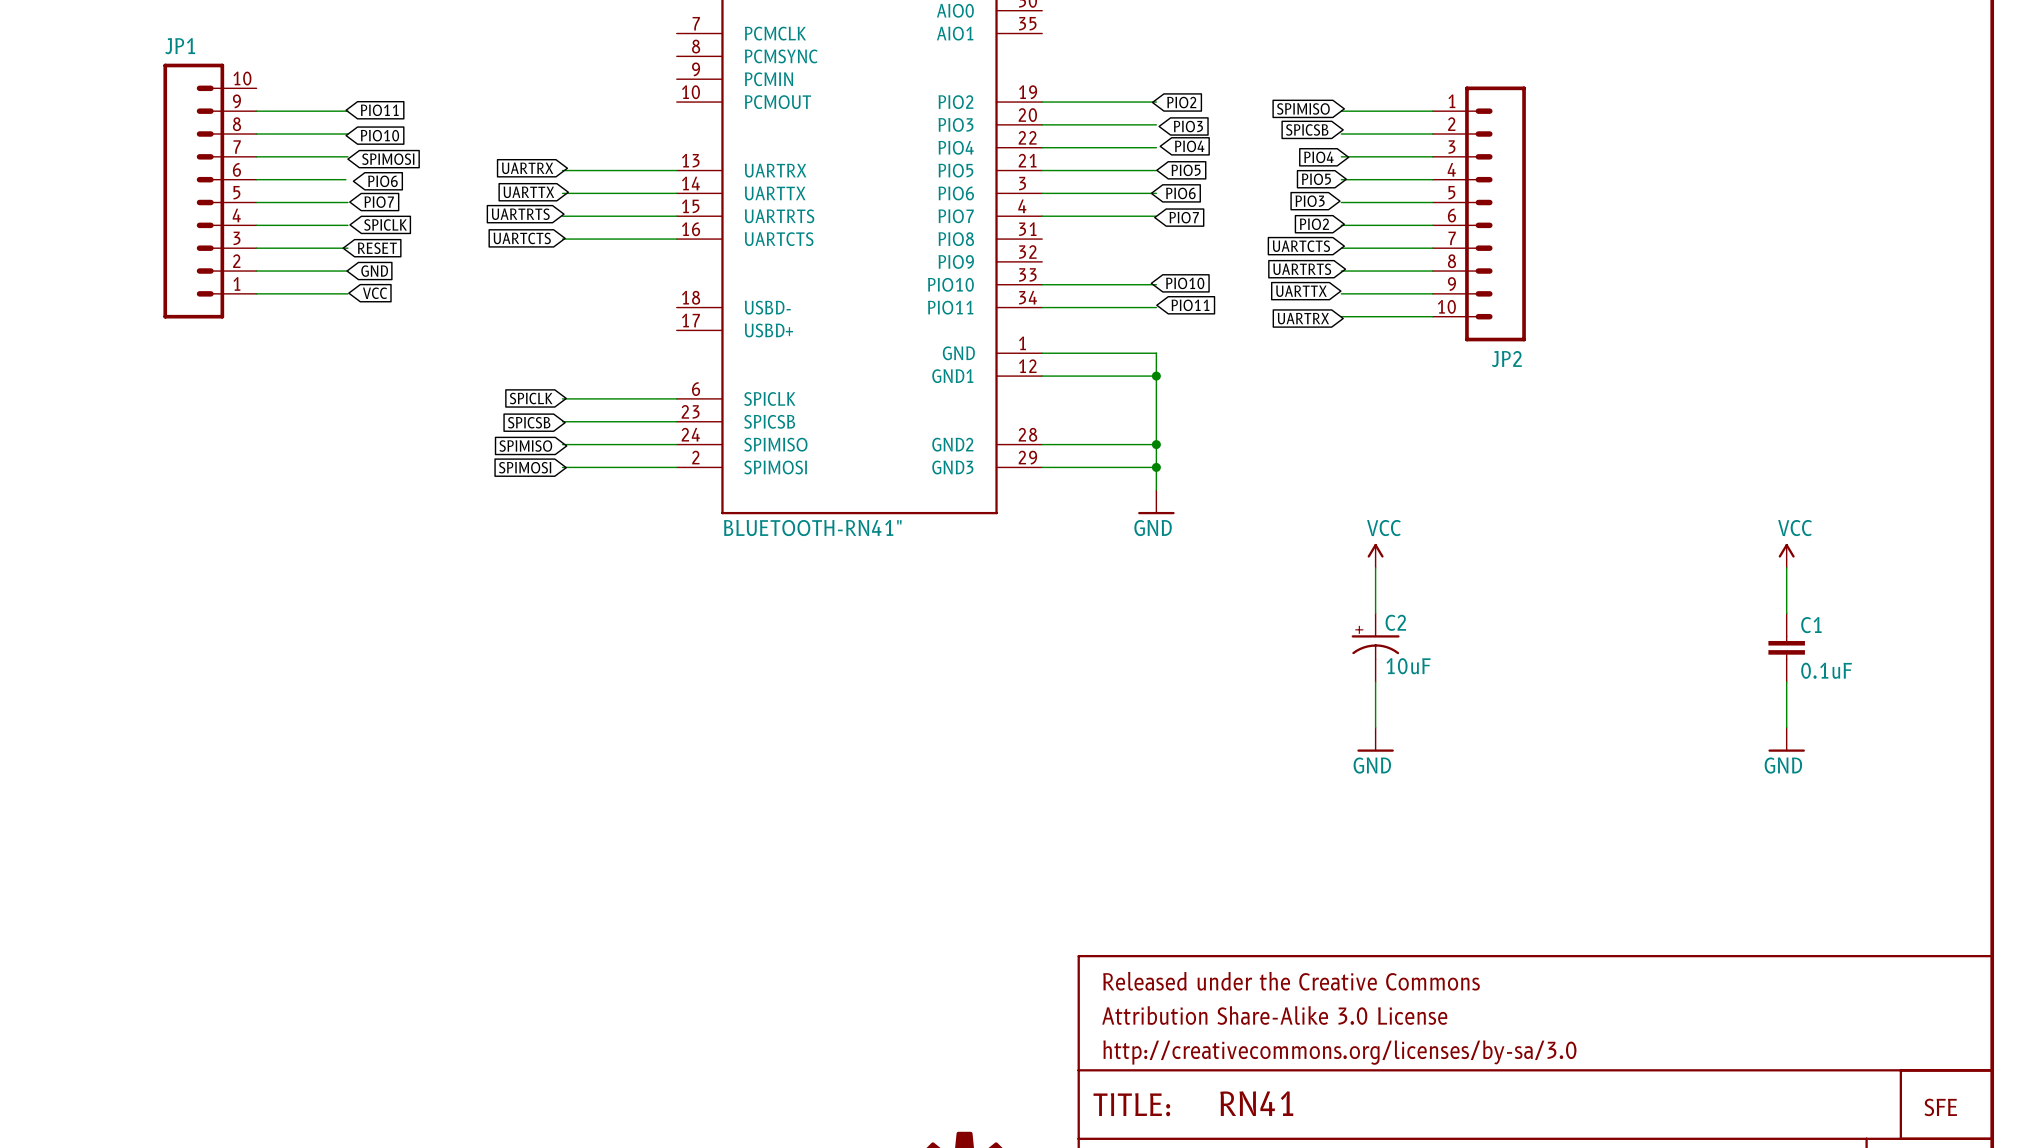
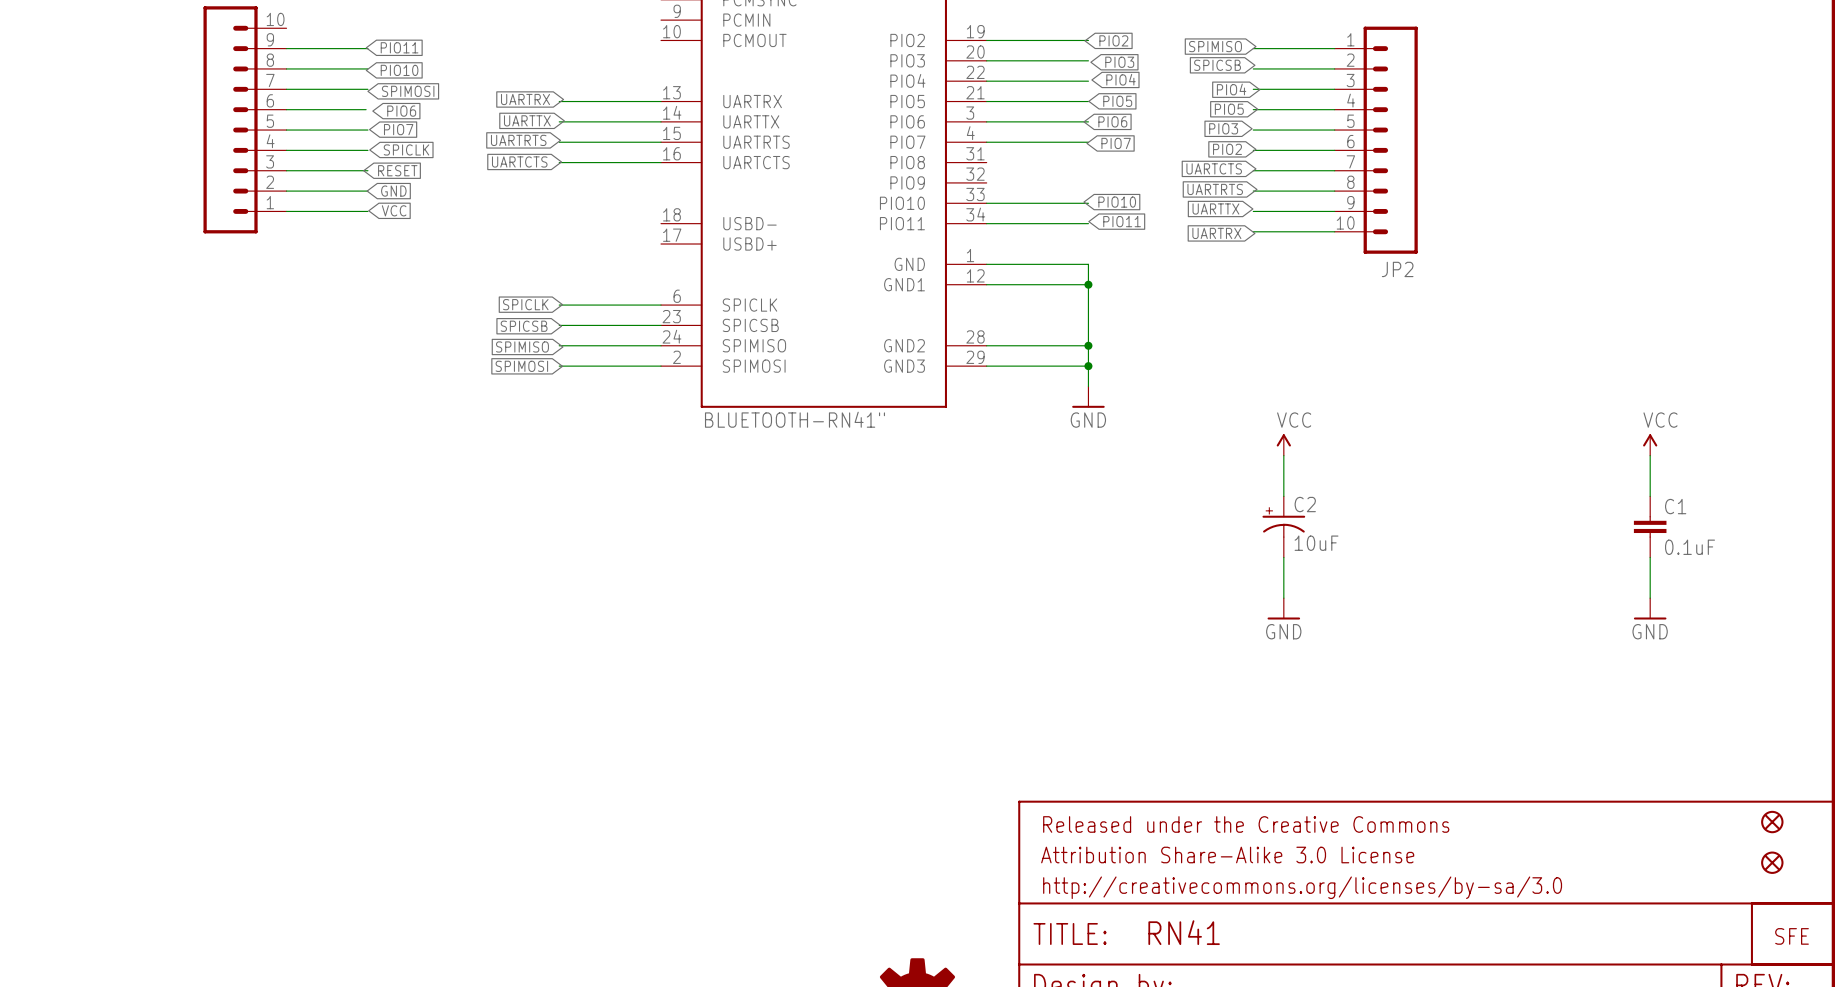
part: none -> (1772, 822)
part: none -> (1772, 862)

